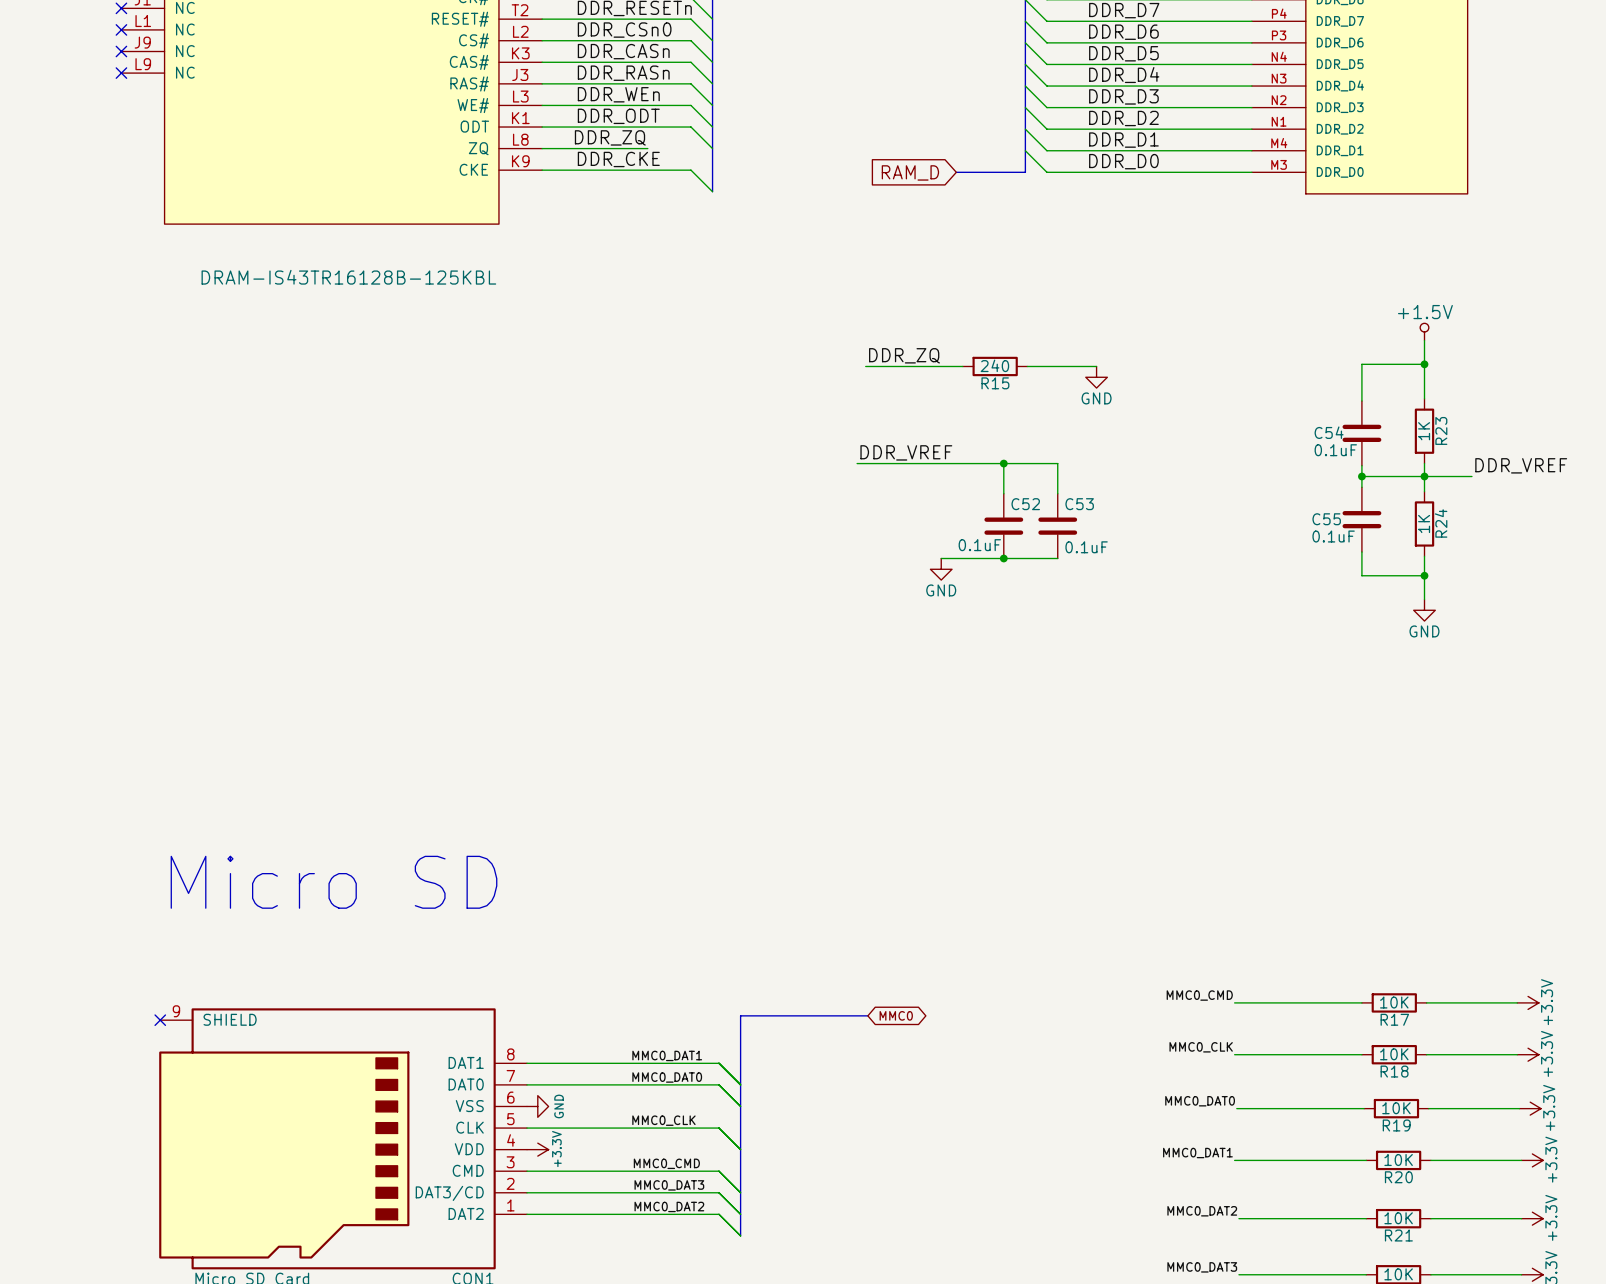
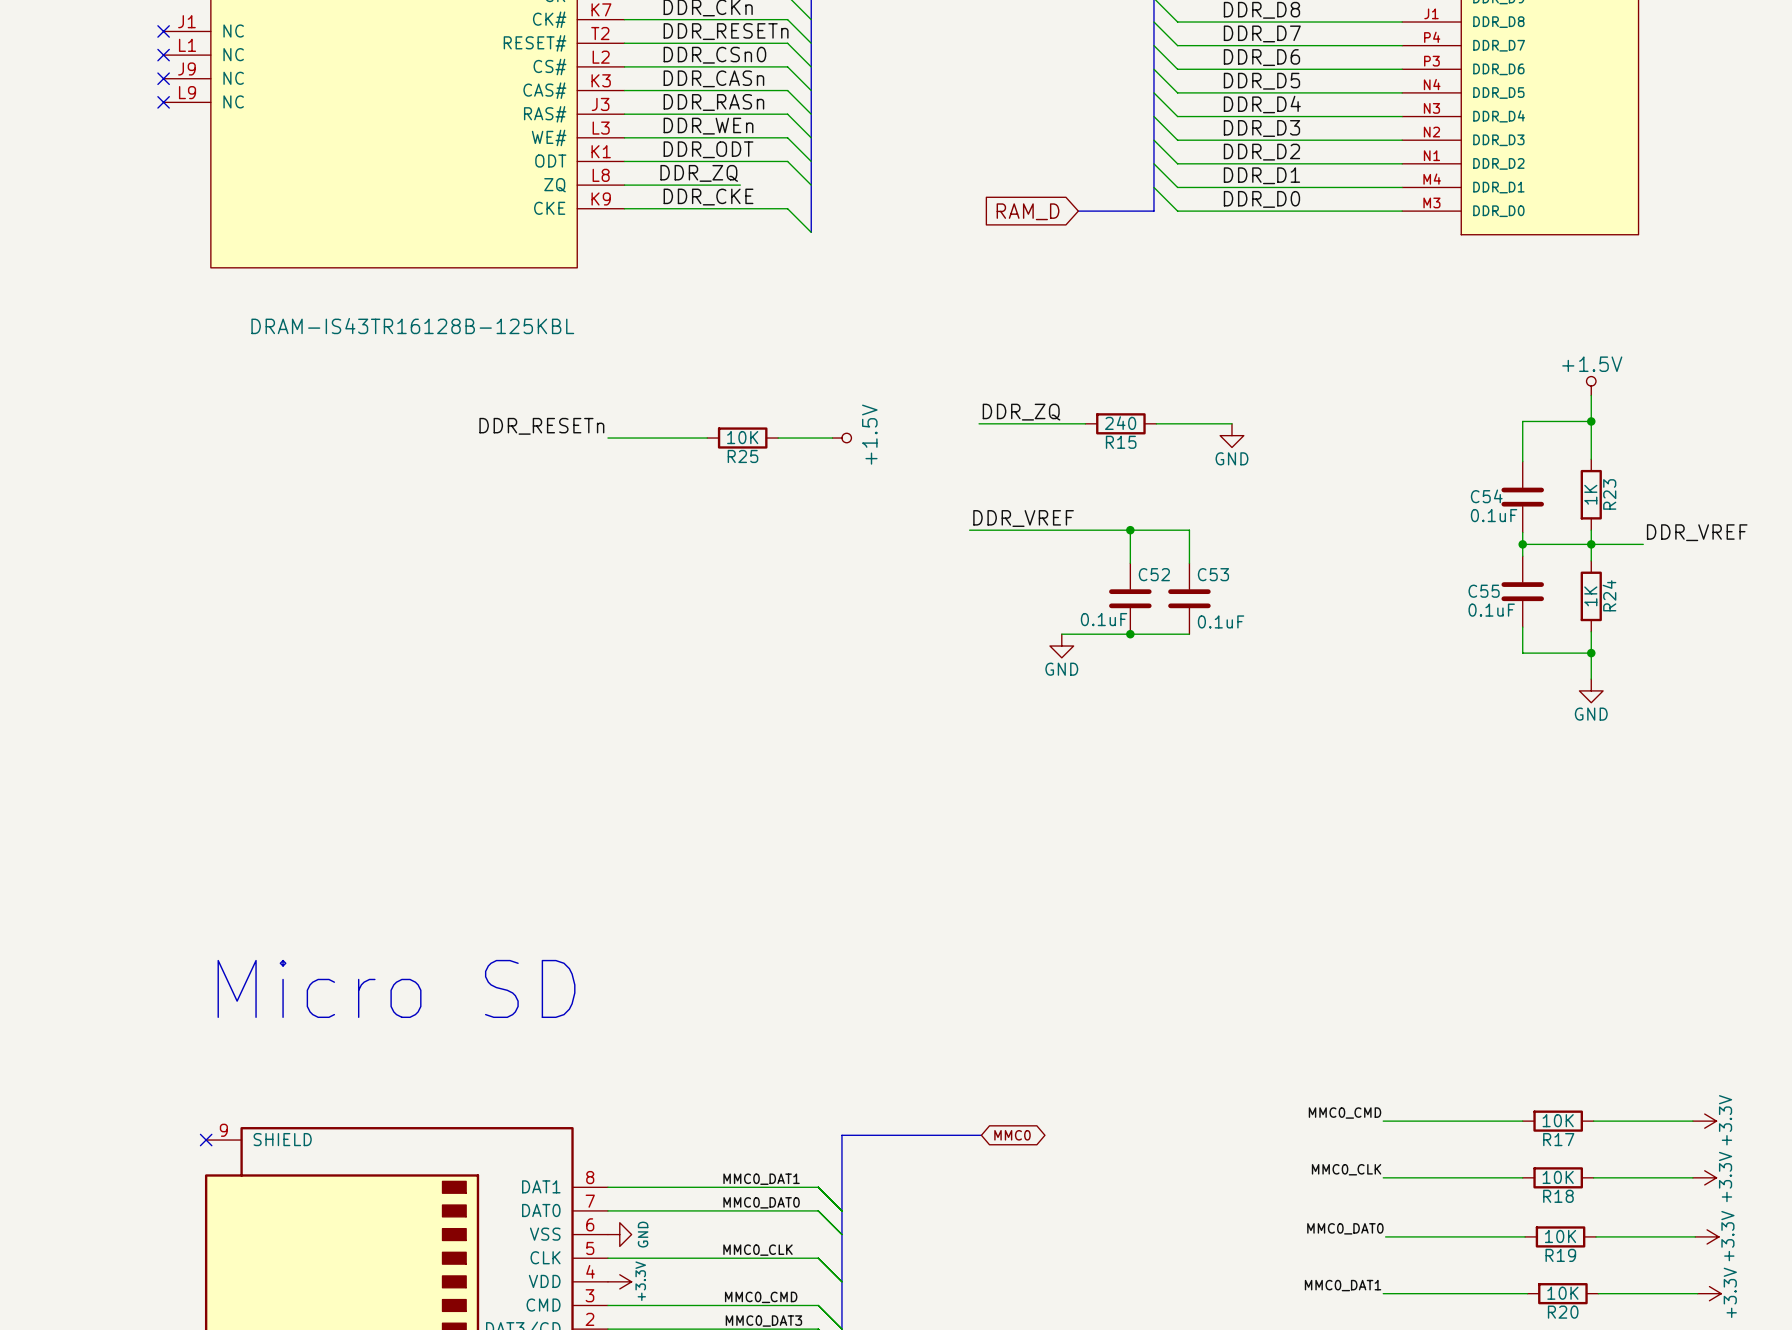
label: none -> DDR_RESETn (541, 426)
wire: none -> (607, 438) (707, 438)
R25: none -> 10K (742, 438)
wire: none -> (778, 438) (832, 438)
power symbol: none -> +1.5V (841, 438)

